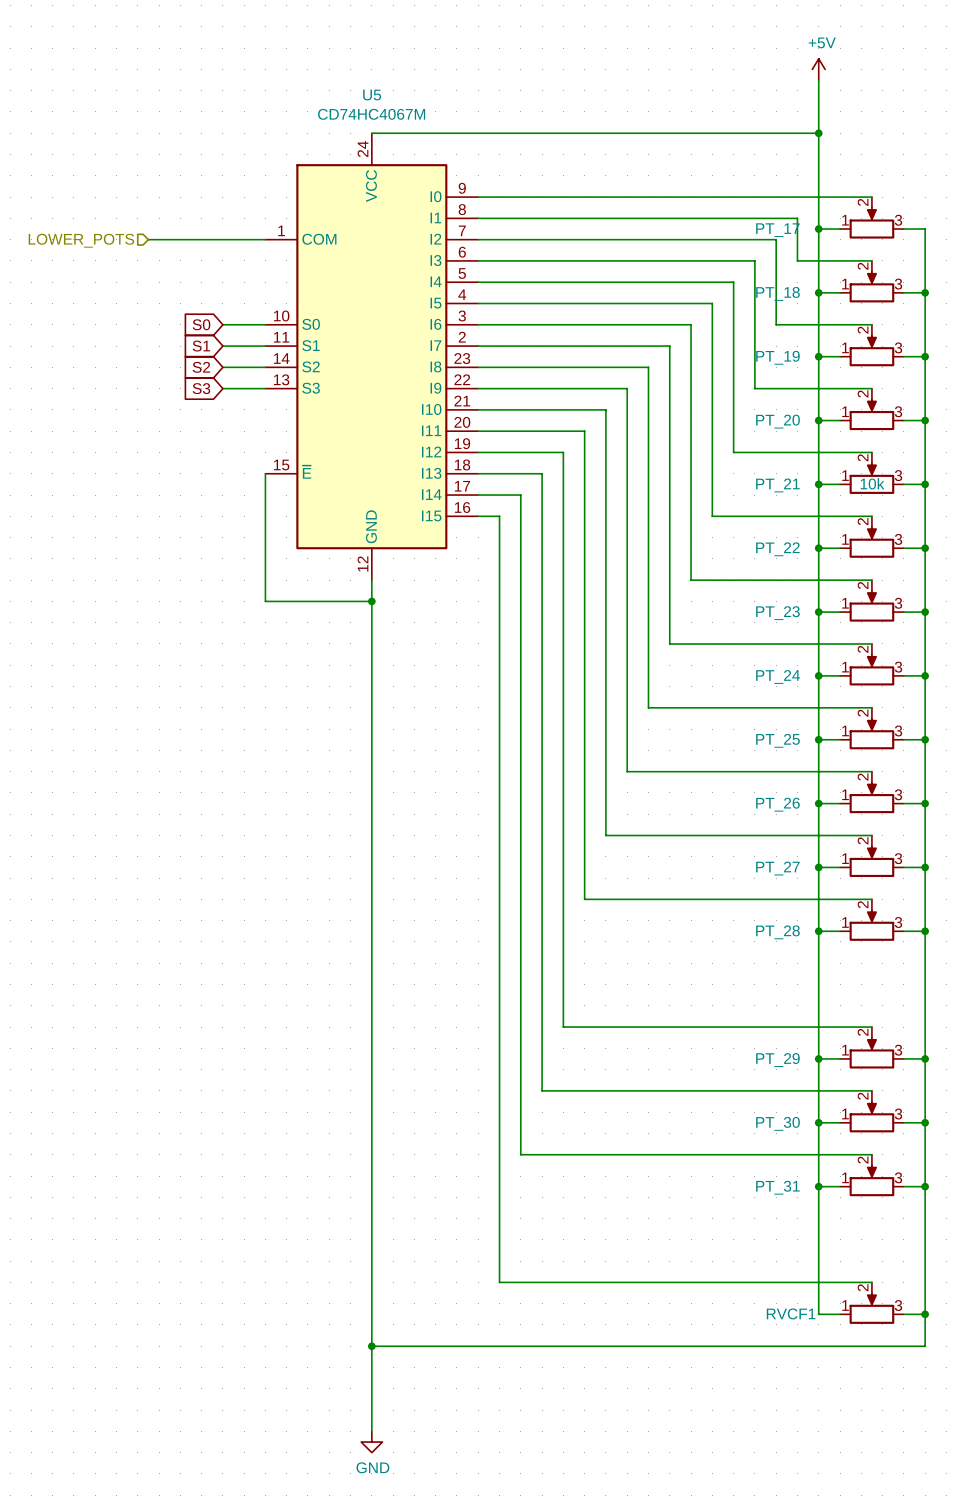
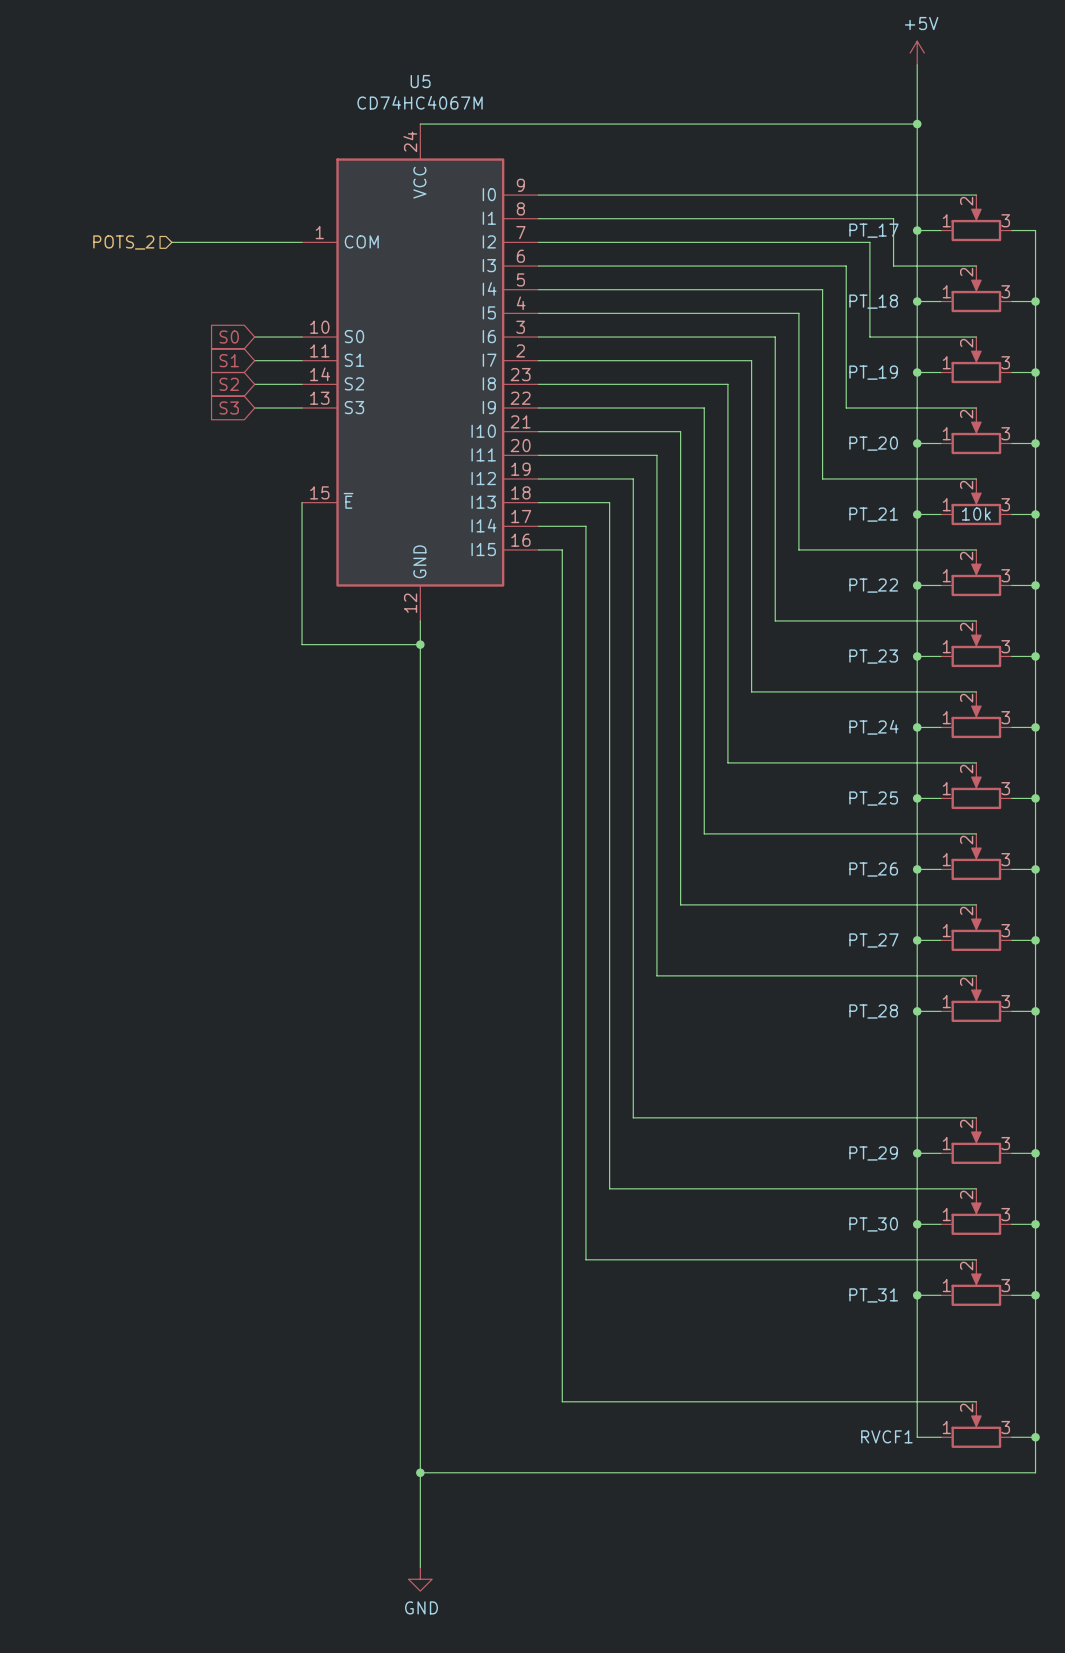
hierarchical label: LOWER_POTS (81, 240) -> POTS_2 (123, 242)

